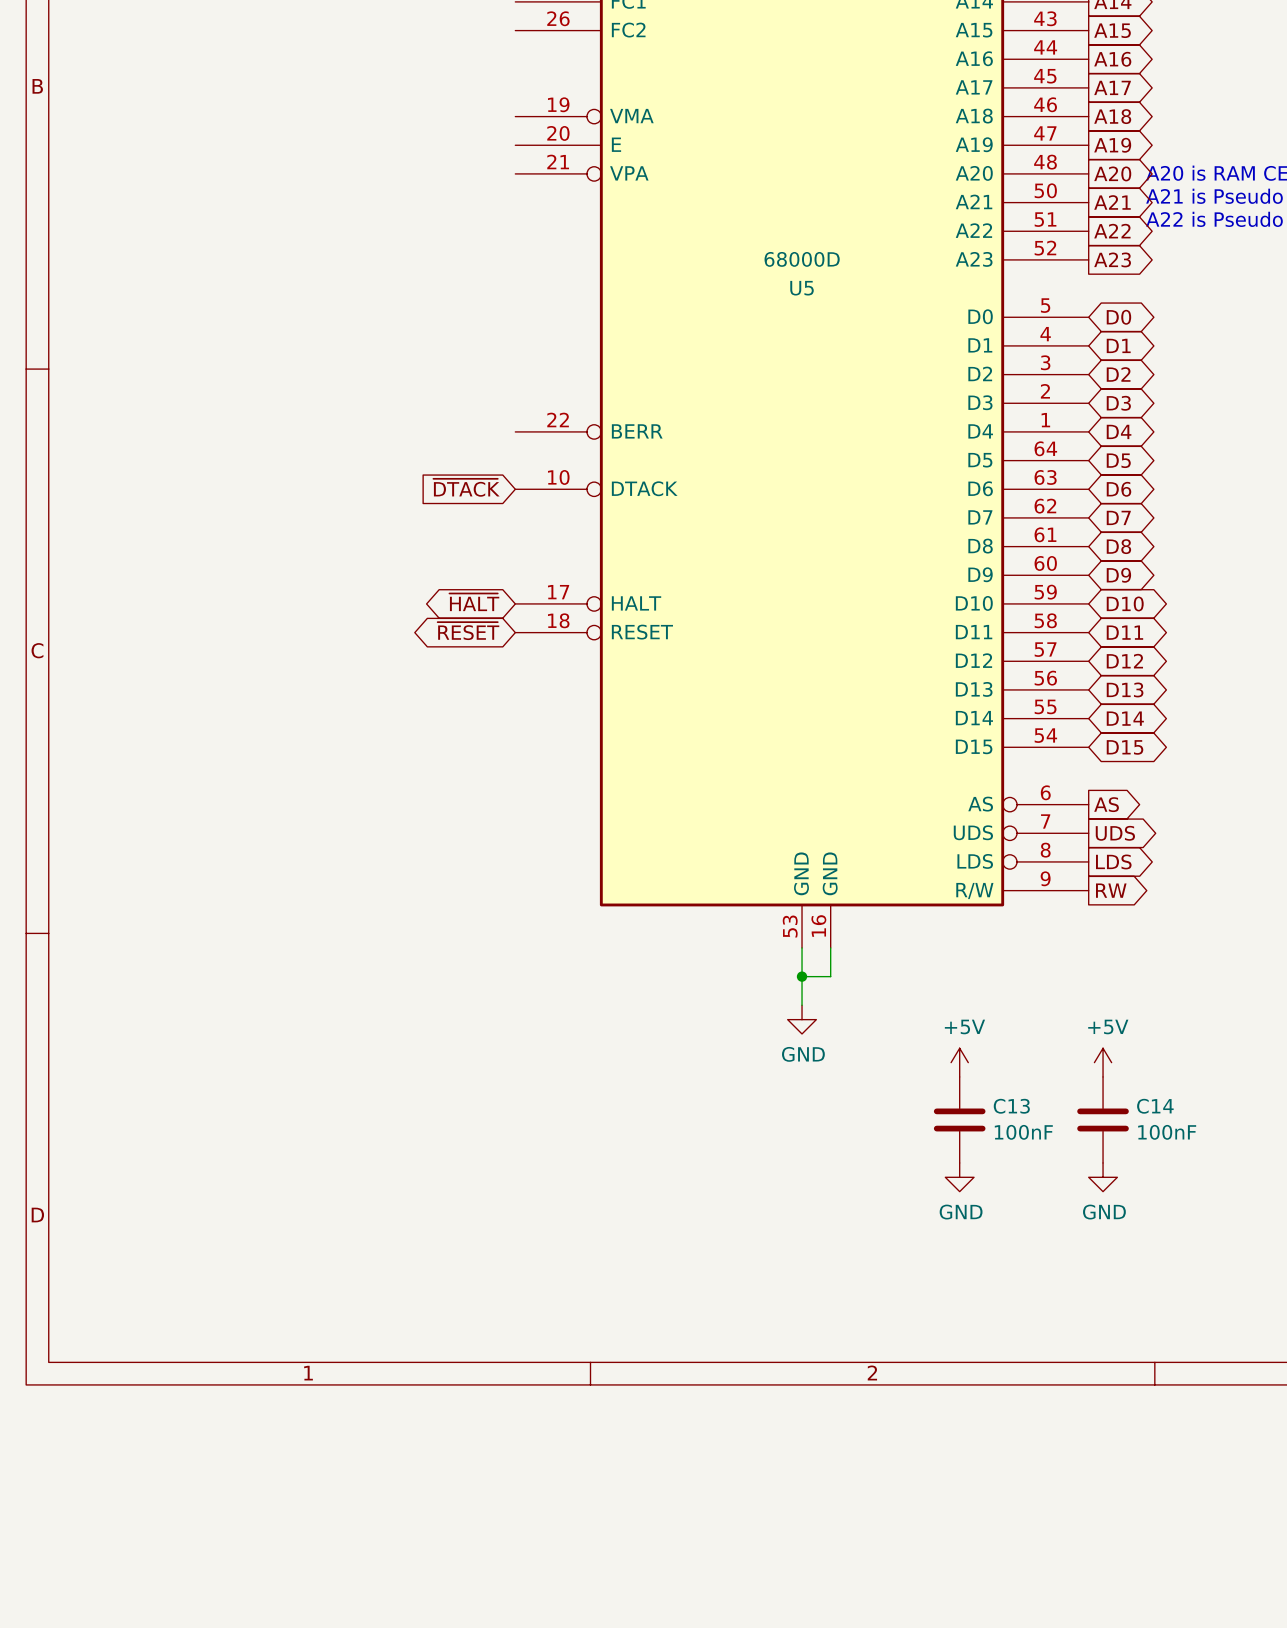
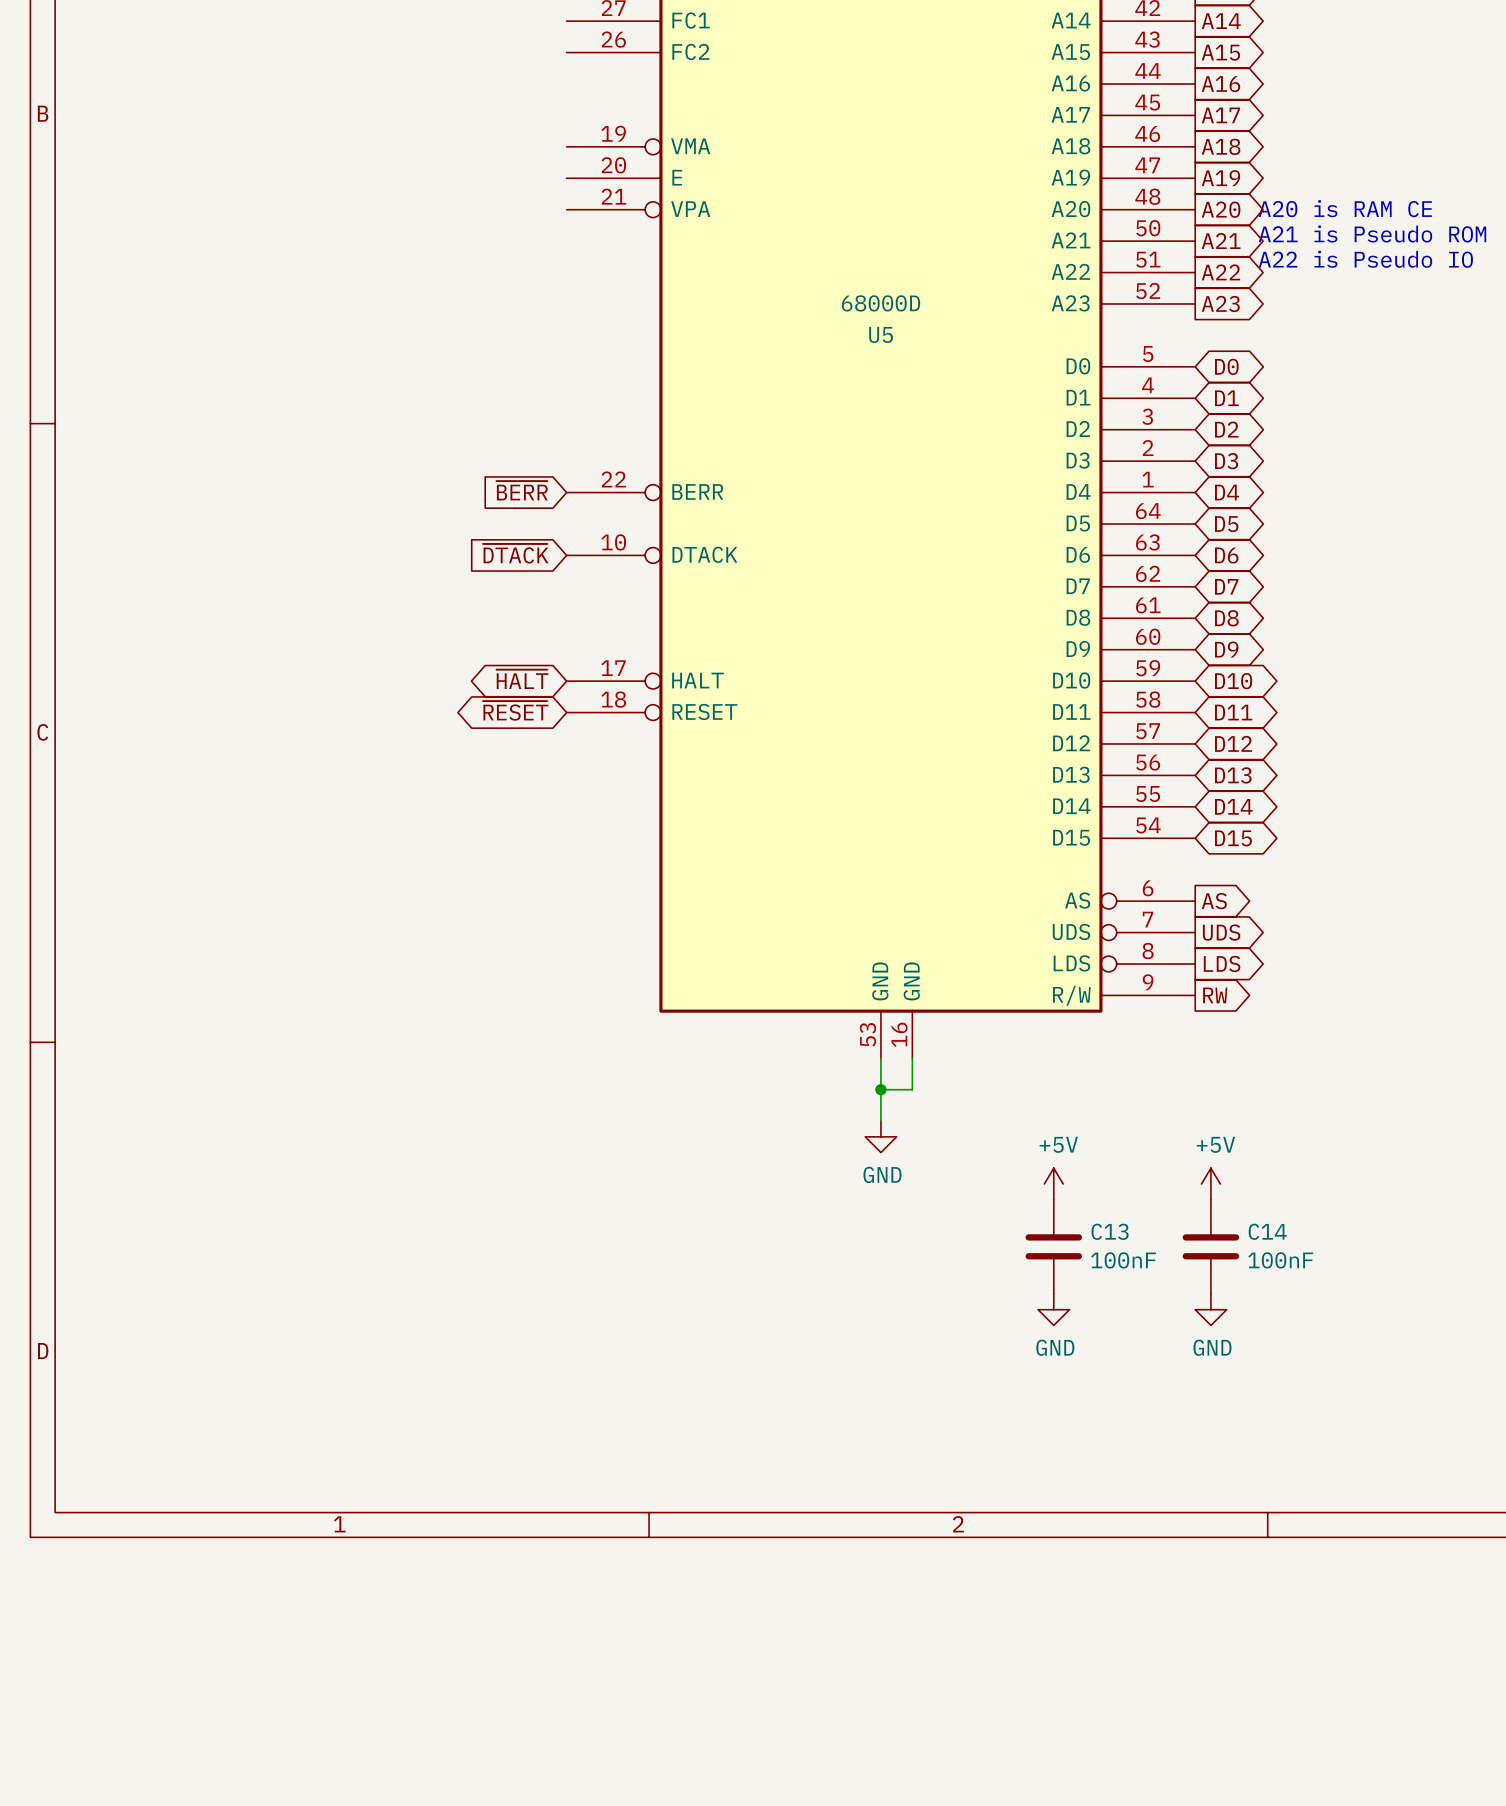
global label: none -> ~{BERR} (522, 490)

